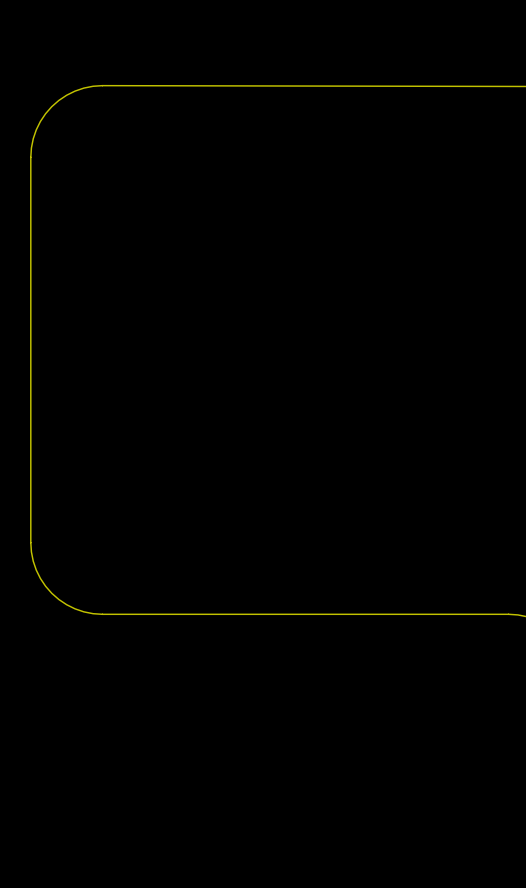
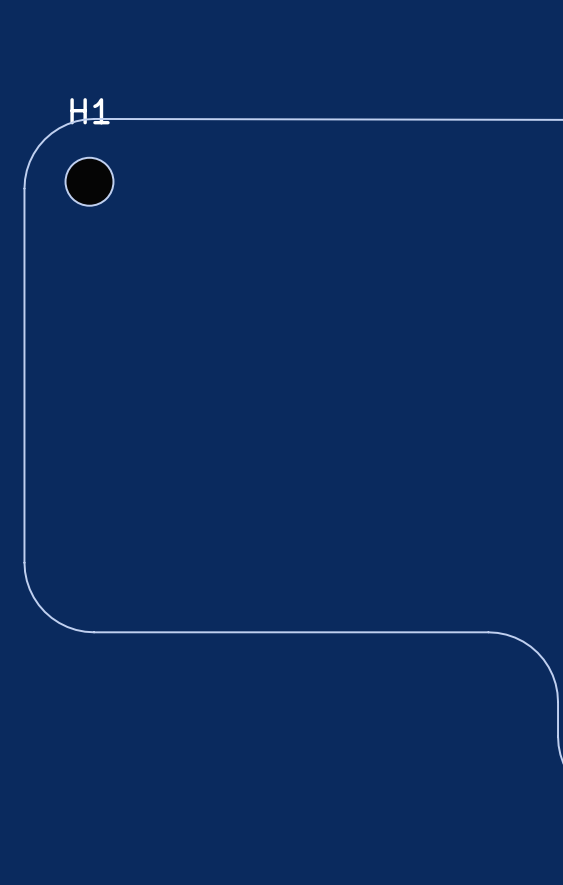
H1: none -> (89, 181)

